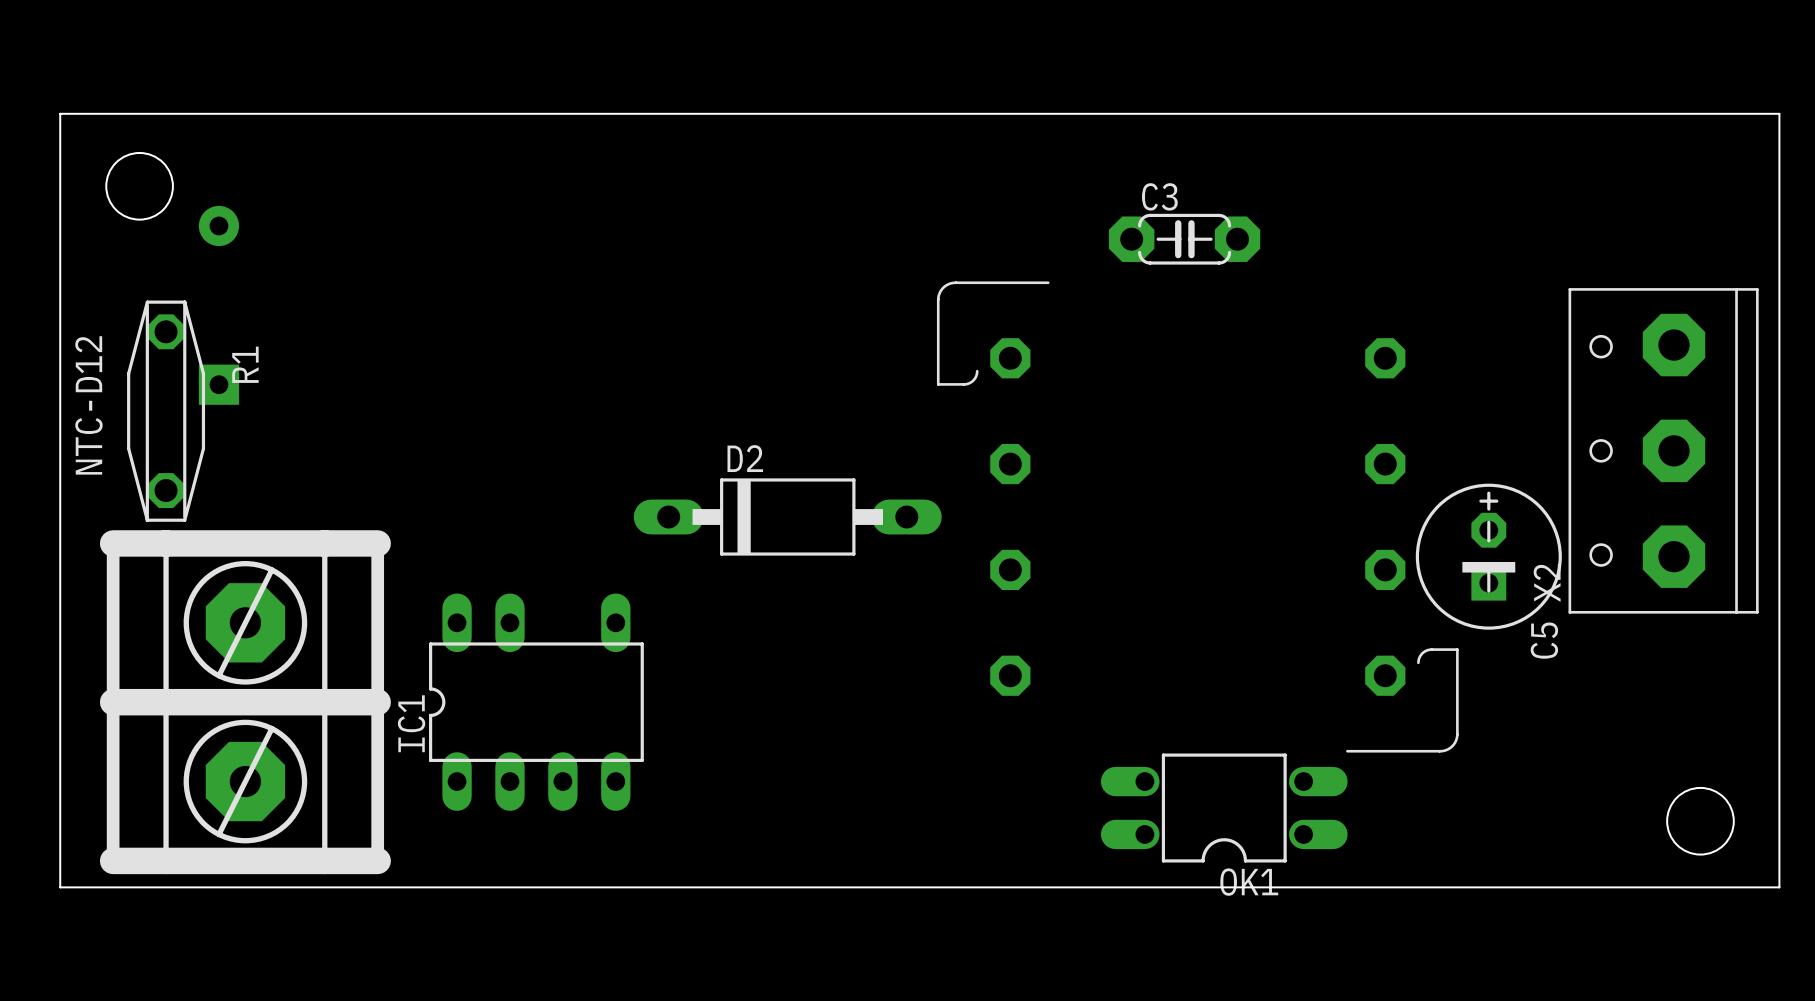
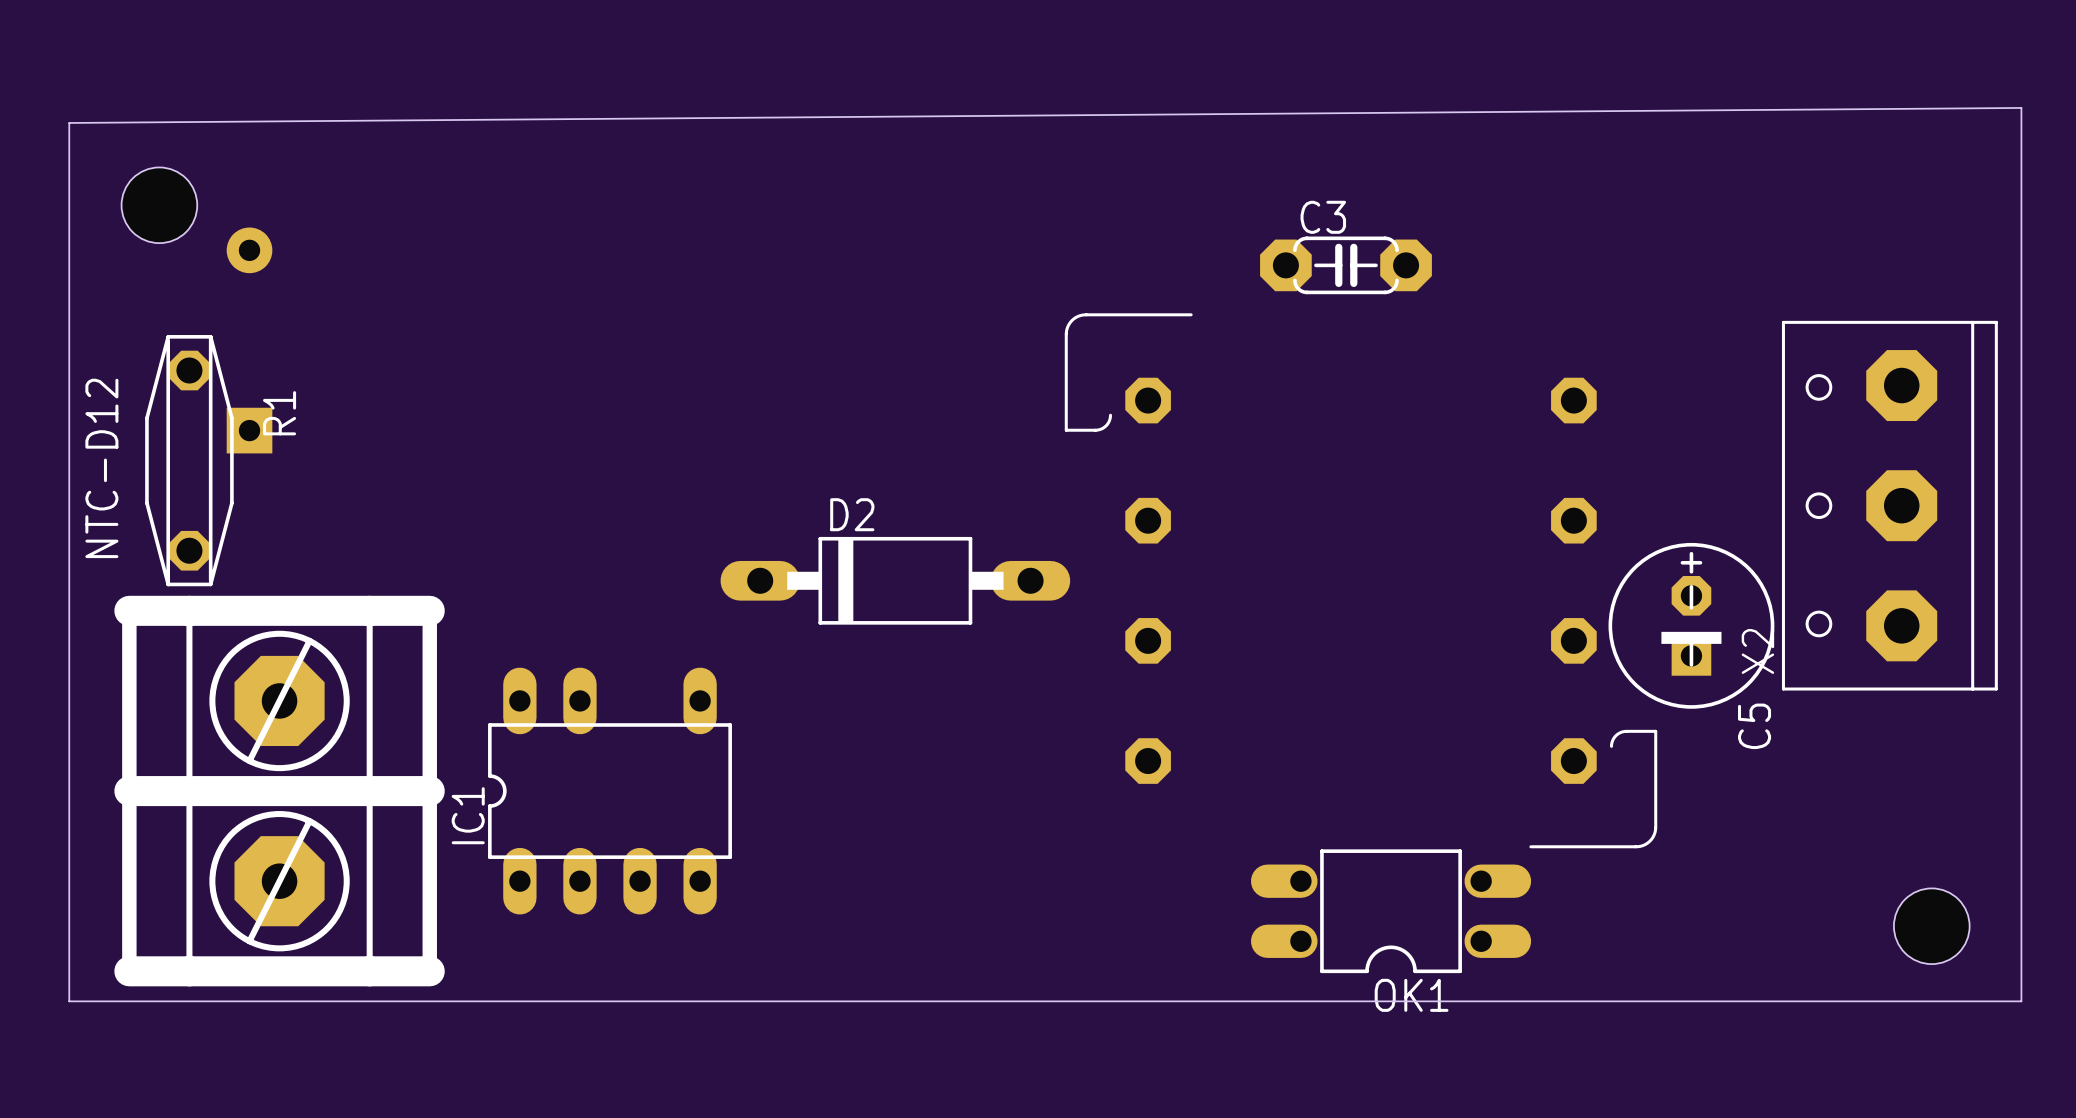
board edge: (60, 113) (1779, 113) -> (69, 122) (2021, 107) (2021, 122)

